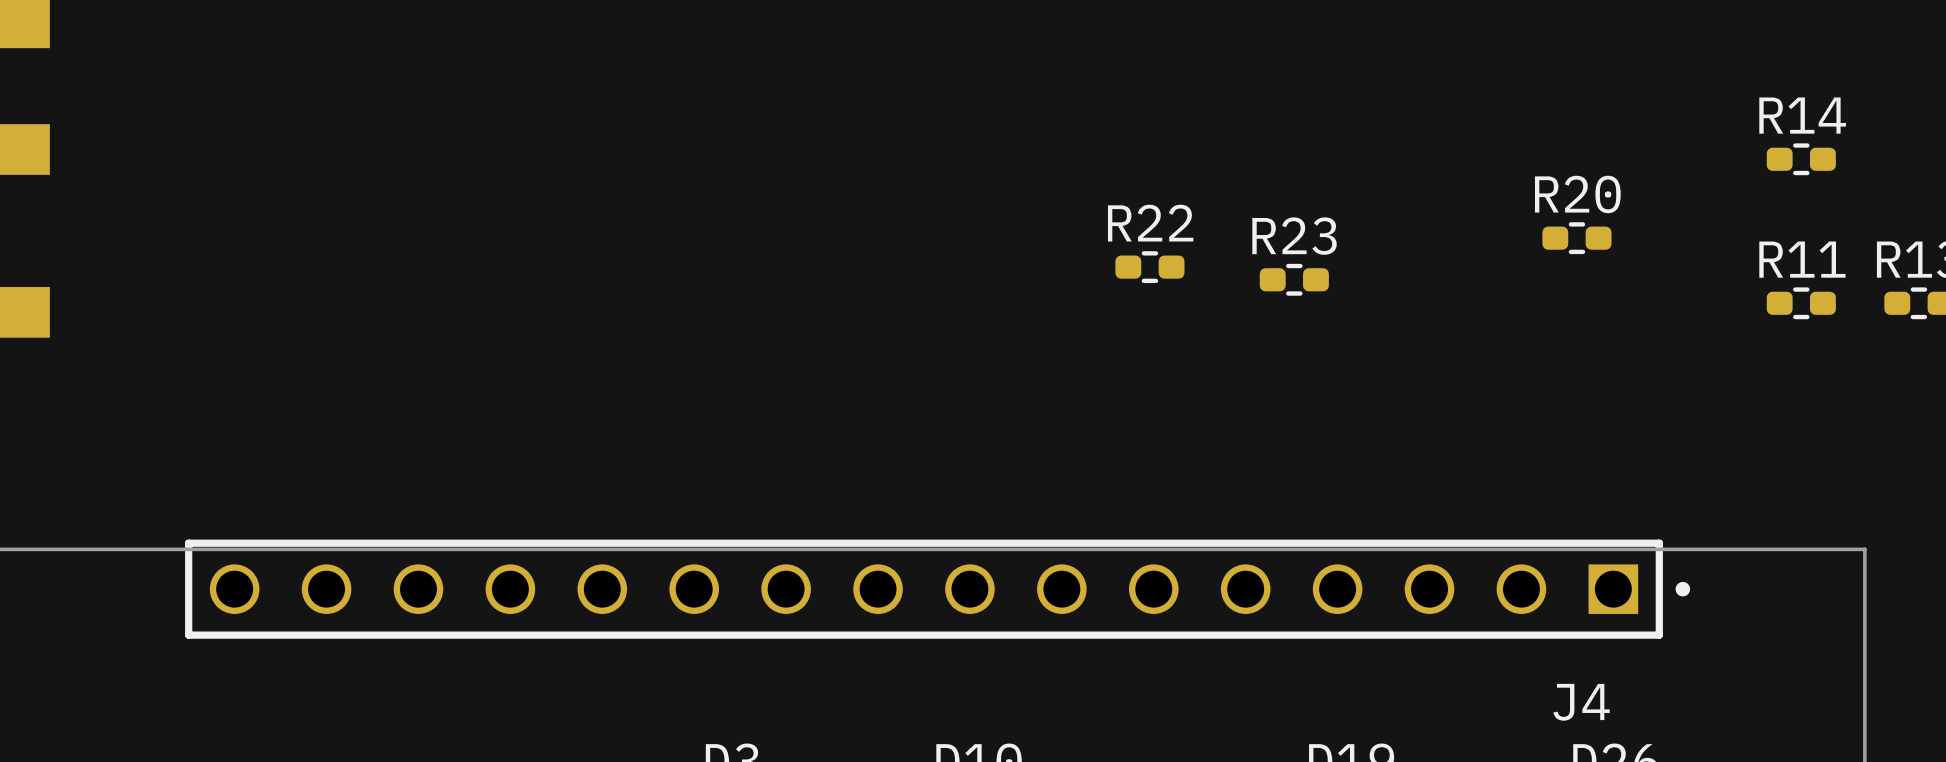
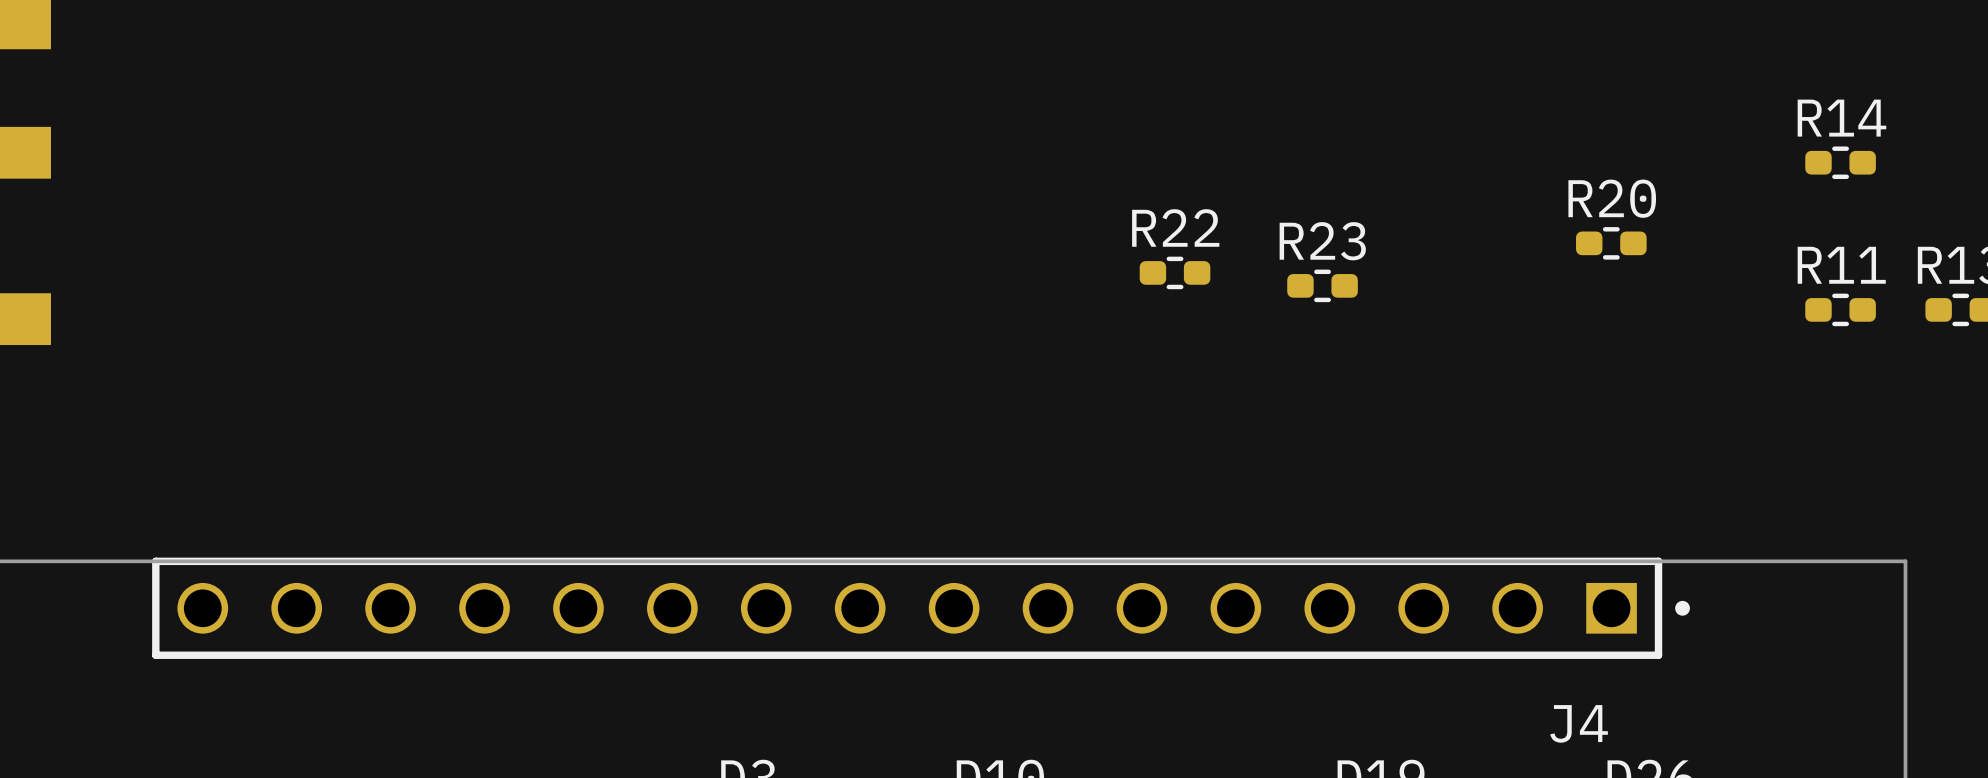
J4 position: (937, 589) -> (921, 608)

